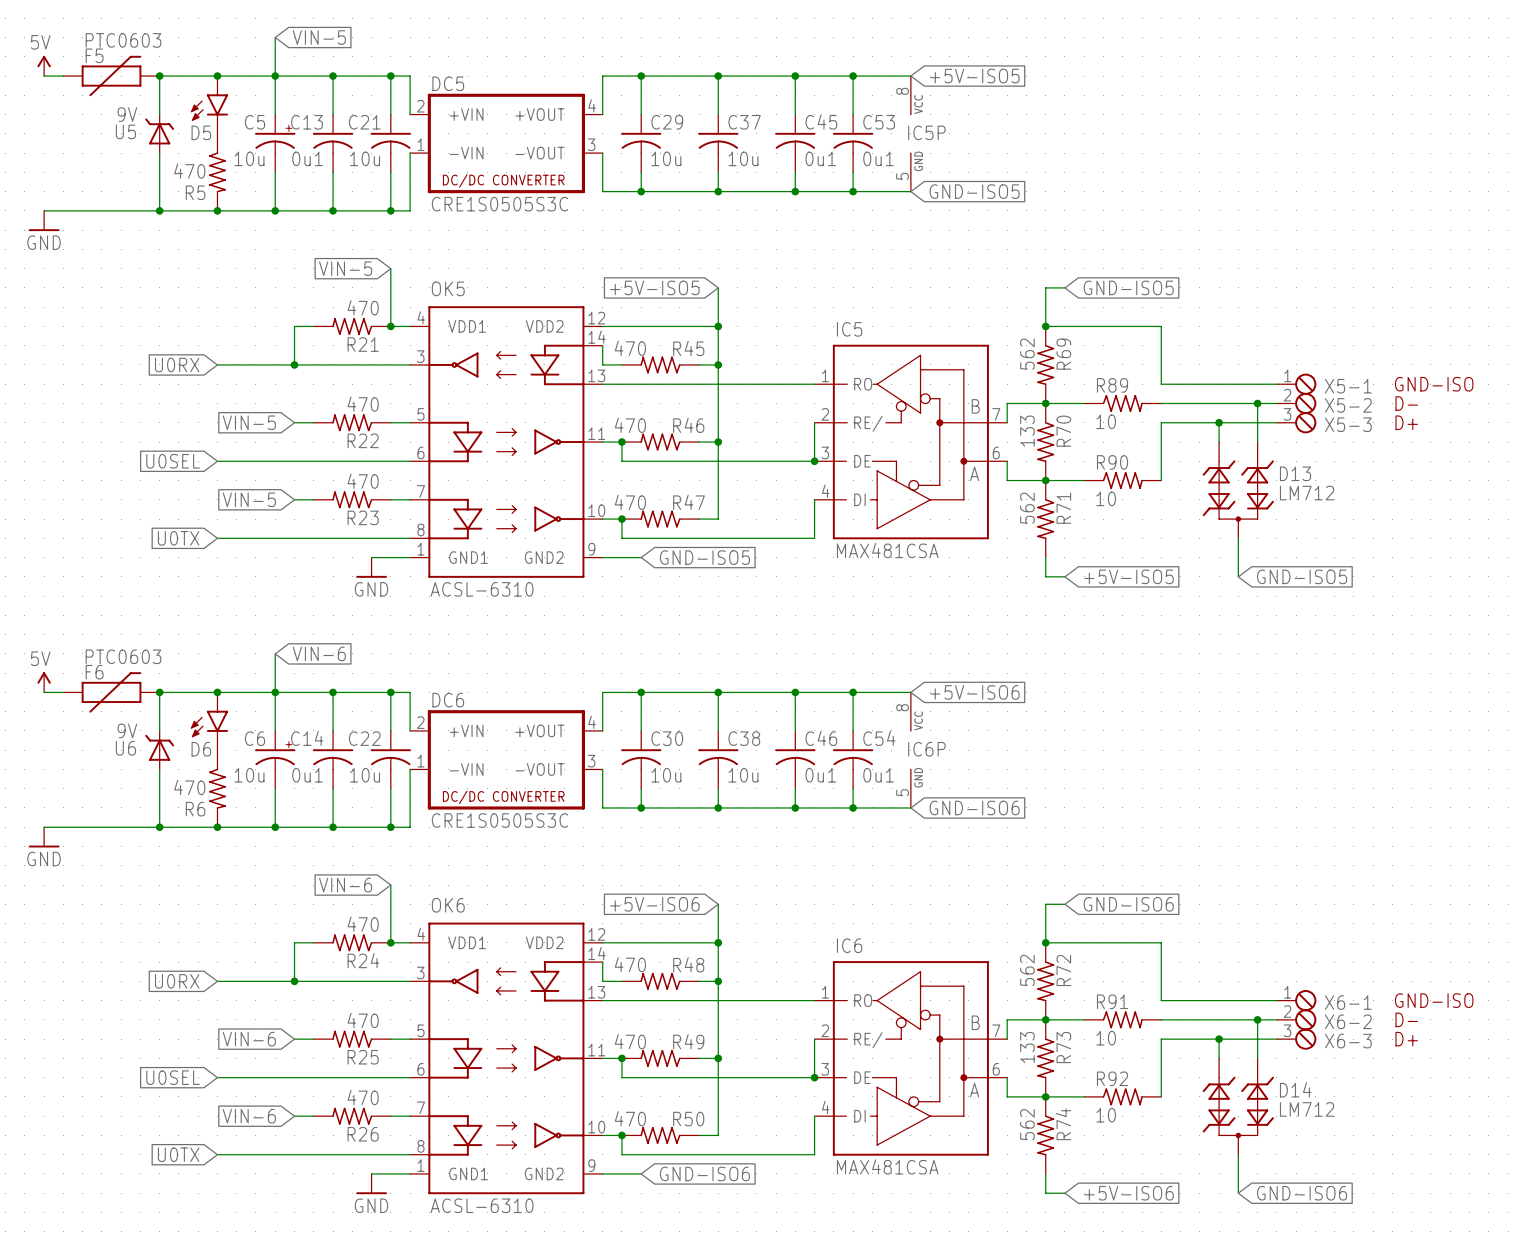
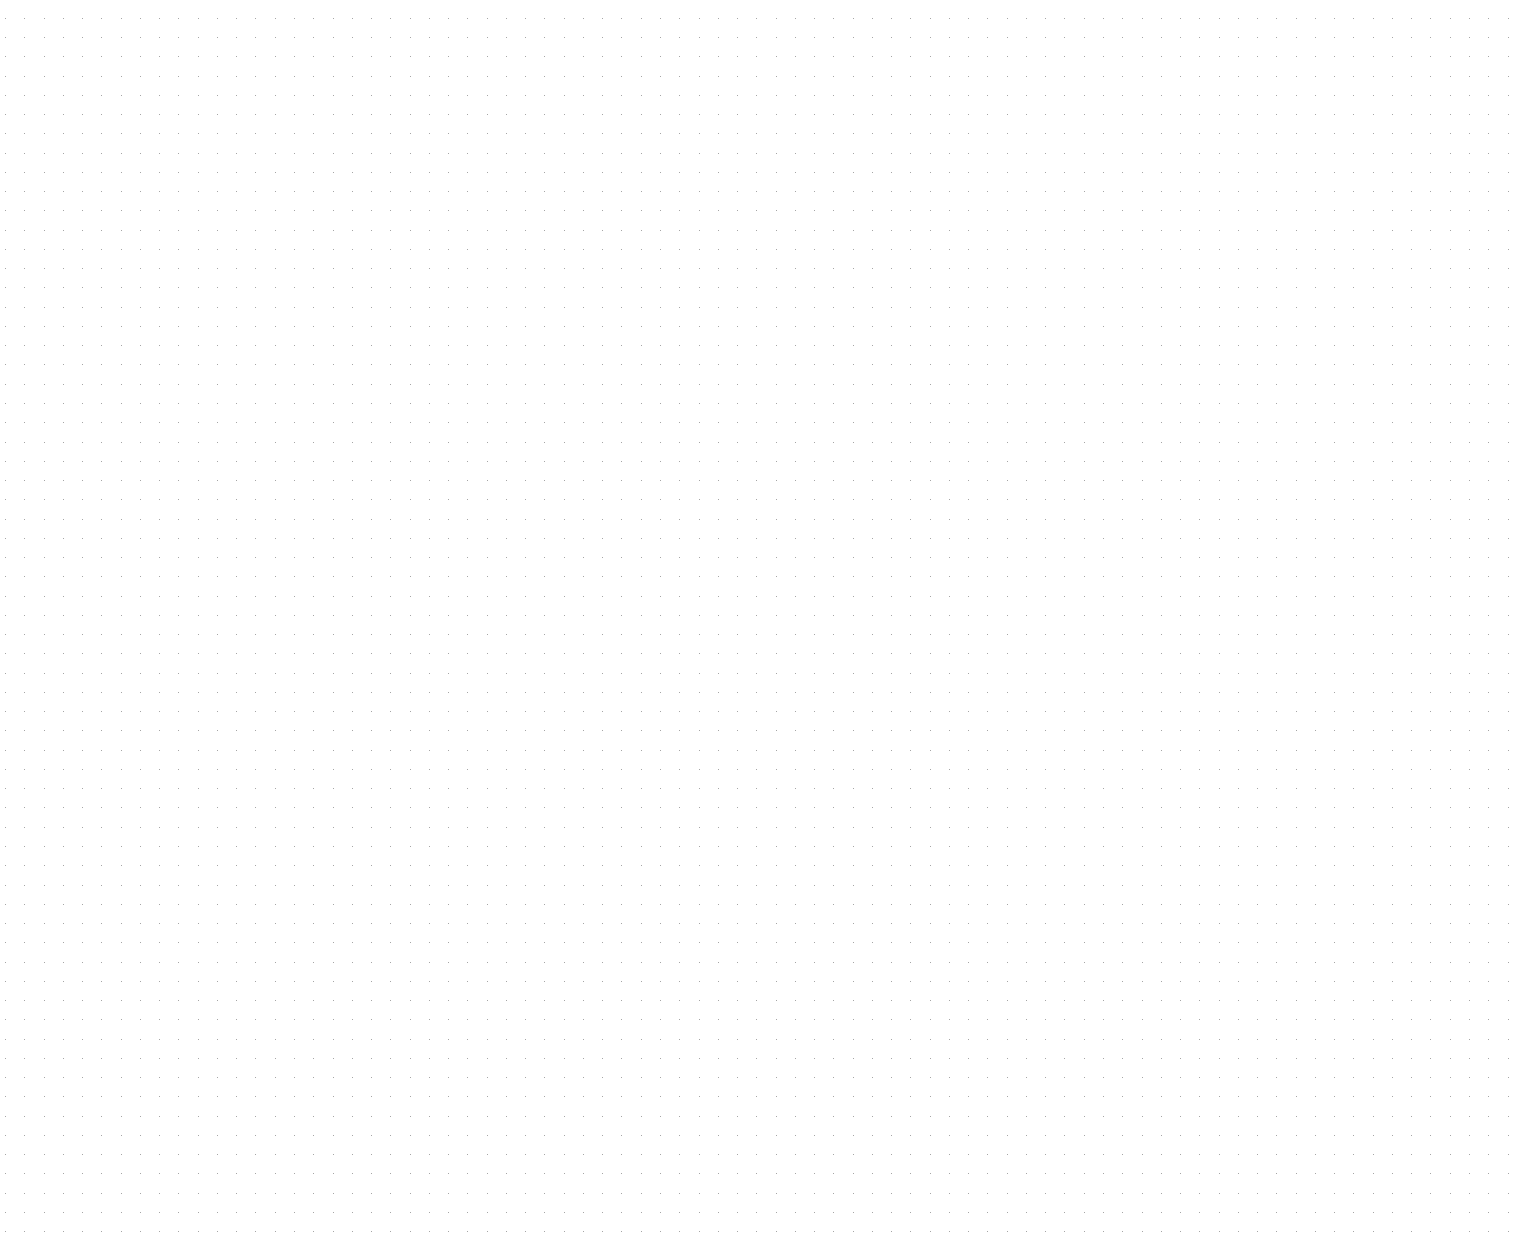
wire: (275, 37) (275, 114) -> none
global label: VIN-5 (319, 37) -> none
power symbol: 5V (44, 65) -> none
wire: (44, 76) (63, 76) -> none
F5: PTC0603 (111, 76) -> none
junction: (159, 76) -> none
junction: (217, 76) -> none
junction: (275, 76) -> none
wire: (333, 76) (333, 114) -> none
junction: (333, 76) -> none
wire: (390, 76) (390, 114) -> none
junction: (390, 76) -> none
wire: (641, 76) (641, 114) -> none
junction: (641, 76) -> none
wire: (718, 76) (718, 114) -> none
junction: (718, 76) -> none
wire: (795, 76) (795, 114) -> none
junction: (795, 76) -> none
wire: (853, 76) (853, 114) -> none
junction: (853, 76) -> none
wire: (910, 76) (602, 76) (602, 114) -> none
global label: +5V-ISO5 (974, 76) -> none
D5: (209, 104) -> none
wire: (159, 114) (159, 76) (410, 76) (410, 114) -> none
U5: 9V (159, 133) -> none
IC5P: (910, 133) -> none
C5: 10u (275, 143) -> none
C13: 0u1 (333, 143) -> none
C21: 10u (390, 143) -> none
DC5: CRE1S0505S3C (506, 143) -> none
C29: 10u (641, 143) -> none
C37: 10u (718, 143) -> none
C45: 0u1 (795, 143) -> none
C53: 0u1 (853, 143) -> none
wire: (159, 153) (159, 210) -> none
wire: (410, 153) (410, 210) (44, 210) -> none
wire: (602, 153) (602, 191) (910, 191) -> none
R5: 470 (217, 172) -> none
wire: (275, 172) (275, 210) -> none
wire: (333, 172) (333, 210) -> none
wire: (390, 172) (390, 210) -> none
wire: (641, 172) (641, 191) -> none
wire: (718, 172) (718, 191) -> none
wire: (795, 172) (795, 191) -> none
wire: (853, 172) (853, 191) -> none
junction: (641, 191) -> none
junction: (718, 191) -> none
junction: (795, 191) -> none
junction: (853, 191) -> none
global label: GND-ISO5 (974, 191) -> none
junction: (159, 210) -> none
junction: (217, 210) -> none
junction: (275, 210) -> none
junction: (333, 210) -> none
junction: (390, 210) -> none
power symbol: GND (44, 220) -> none
global label: VIN-5 (345, 268) -> none
wire: (390, 268) (390, 326) (410, 326) -> none
global label: +5V-ISO5 (654, 287) -> none
wire: (718, 287) (718, 519) (699, 519) -> none
wire: (1064, 287) (1045, 287) (1045, 326) (1161, 326) (1161, 384) (1276, 384) -> none
global label: GND-ISO5 (1128, 287) -> none
wire: (313, 326) (294, 326) (294, 364) -> none
R21: 470 (352, 326) -> none
junction: (390, 326) -> none
wire: (602, 326) (718, 326) -> none
junction: (718, 326) -> none
junction: (1045, 326) -> none
wire: (602, 345) (602, 364) (621, 364) -> none
global label: U0RX (177, 364) -> none
wire: (217, 364) (410, 364) -> none
junction: (294, 364) -> none
R45: 470 (660, 364) -> none
wire: (699, 364) (718, 364) -> none
junction: (718, 364) -> none
R69: 562 (1045, 364) -> none
wire: (602, 384) (814, 384) -> none
X5-1: (1296, 384) -> none
text: GND-ISO (1434, 384) -> none
junction: (1045, 403) -> none
wire: (1084, 403) (1007, 403) (1007, 422) -> none
R89: 10 (1122, 403) -> none
wire: (1161, 403) (1276, 403) -> none
wire: (1257, 403) (1257, 442) -> none
junction: (1257, 403) -> none
X5-2: (1296, 403) -> none
text: D- (1406, 403) -> none
global label: VIN-5 (249, 422) -> none
wire: (294, 422) (313, 422) -> none
R22: 470 (352, 422) -> none
wire: (390, 422) (410, 422) -> none
wire: (814, 422) (814, 461) (621, 461) (621, 442) (602, 442) -> none
wire: (1219, 422) (1219, 442) -> none
junction: (1219, 422) -> none
wire: (1276, 422) (1161, 422) (1161, 480) -> none
X5-3: (1296, 422) -> none
text: D+ (1406, 422) -> none
OK5: ACSL-6310 (506, 442) -> none
junction: (621, 442) -> none
R46: 470 (660, 442) -> none
wire: (699, 442) (718, 442) -> none
junction: (718, 442) -> none
IC5: MAX481CSA (910, 442) -> none
R70: 133 (1045, 442) -> none
global label: U0SEL (173, 461) -> none
wire: (217, 461) (410, 461) -> none
junction: (814, 461) -> none
wire: (1007, 461) (1007, 480) (1084, 480) -> none
junction: (1045, 480) -> none
R90: 10 (1122, 480) -> none
D13: LM712 (1238, 490) -> none
global label: VIN-5 (249, 499) -> none
wire: (294, 499) (313, 499) -> none
R23: 470 (352, 499) -> none
wire: (390, 499) (410, 499) -> none
wire: (814, 499) (814, 538) (621, 538) (621, 519) (602, 519) -> none
junction: (621, 519) -> none
R47: 470 (660, 519) -> none
R71: 562 (1045, 519) -> none
global label: U0TX (178, 538) -> none
wire: (217, 538) (410, 538) -> none
wire: (1238, 538) (1238, 576) -> none
wire: (371, 557) (410, 557) -> none
wire: (602, 557) (641, 557) -> none
global label: GND-ISO5 (704, 557) -> none
wire: (1045, 557) (1045, 576) (1064, 576) -> none
power symbol: GND (371, 567) -> none
global label: +5V-ISO5 (1128, 576) -> none
global label: GND-ISO5 (1302, 576) -> none
wire: (275, 653) (275, 730) -> none
global label: VIN-6 (319, 653) -> none
power symbol: 5V (44, 682) -> none
wire: (44, 692) (63, 692) -> none
F6: PTC0603 (111, 692) -> none
junction: (159, 692) -> none
junction: (217, 692) -> none
junction: (275, 692) -> none
wire: (333, 692) (333, 730) -> none
junction: (333, 692) -> none
wire: (390, 692) (390, 730) -> none
junction: (390, 692) -> none
wire: (641, 692) (641, 730) -> none
junction: (641, 692) -> none
wire: (718, 692) (718, 730) -> none
junction: (718, 692) -> none
wire: (795, 692) (795, 730) -> none
junction: (795, 692) -> none
wire: (853, 692) (853, 730) -> none
junction: (853, 692) -> none
wire: (910, 692) (602, 692) (602, 730) -> none
global label: +5V-ISO6 (974, 692) -> none
D6: (209, 721) -> none
wire: (159, 730) (159, 692) (410, 692) (410, 730) -> none
U6: 9V (159, 750) -> none
IC6P: (910, 750) -> none
C6: 10u (275, 759) -> none
C14: 0u1 (333, 759) -> none
C22: 10u (390, 759) -> none
DC6: CRE1S0505S3C (506, 759) -> none
C30: 10u (641, 759) -> none
C38: 10u (718, 759) -> none
C46: 0u1 (795, 759) -> none
C54: 0u1 (853, 759) -> none
wire: (159, 769) (159, 827) -> none
wire: (410, 769) (410, 827) (44, 827) -> none
wire: (602, 769) (602, 807) (910, 807) -> none
R6: 470 (217, 788) -> none
wire: (275, 788) (275, 827) -> none
wire: (333, 788) (333, 827) -> none
wire: (390, 788) (390, 827) -> none
wire: (641, 788) (641, 807) -> none
wire: (718, 788) (718, 807) -> none
wire: (795, 788) (795, 807) -> none
wire: (853, 788) (853, 807) -> none
junction: (641, 807) -> none
junction: (718, 807) -> none
junction: (795, 807) -> none
junction: (853, 807) -> none
global label: GND-ISO6 (974, 807) -> none
junction: (159, 827) -> none
junction: (217, 827) -> none
junction: (275, 827) -> none
junction: (333, 827) -> none
junction: (390, 827) -> none
power symbol: GND (44, 837) -> none
global label: VIN-6 (345, 885) -> none
wire: (390, 885) (390, 942) (410, 942) -> none
global label: +5V-ISO6 (654, 904) -> none
wire: (718, 904) (718, 1135) (699, 1135) -> none
wire: (1064, 904) (1045, 904) (1045, 942) (1161, 942) (1161, 1000) (1276, 1000) -> none
global label: GND-ISO6 (1128, 904) -> none
wire: (313, 942) (294, 942) (294, 981) -> none
R24: 470 (352, 942) -> none
junction: (390, 942) -> none
wire: (602, 942) (718, 942) -> none
junction: (718, 942) -> none
junction: (1045, 942) -> none
wire: (602, 962) (602, 981) (621, 981) -> none
global label: U0RX (177, 981) -> none
wire: (217, 981) (410, 981) -> none
junction: (294, 981) -> none
R48: 470 (660, 981) -> none
wire: (699, 981) (718, 981) -> none
junction: (718, 981) -> none
R72: 562 (1045, 981) -> none
wire: (602, 1000) (814, 1000) -> none
X6-1: (1296, 1000) -> none
text: GND-ISO (1434, 1000) -> none
junction: (1045, 1019) -> none
wire: (1084, 1019) (1007, 1019) (1007, 1039) -> none
R91: 10 (1122, 1019) -> none
wire: (1161, 1019) (1276, 1019) -> none
wire: (1257, 1019) (1257, 1058) -> none
junction: (1257, 1019) -> none
X6-2: (1296, 1019) -> none
text: D- (1406, 1019) -> none
global label: VIN-6 (249, 1039) -> none
wire: (294, 1039) (313, 1039) -> none
R25: 470 (352, 1039) -> none
wire: (390, 1039) (410, 1039) -> none
wire: (814, 1039) (814, 1077) (621, 1077) (621, 1058) (602, 1058) -> none
wire: (1219, 1039) (1219, 1058) -> none
junction: (1219, 1039) -> none
wire: (1276, 1039) (1161, 1039) (1161, 1096) -> none
X6-3: (1296, 1039) -> none
text: D+ (1406, 1039) -> none
OK6: ACSL-6310 (506, 1058) -> none
junction: (621, 1058) -> none
R49: 470 (660, 1058) -> none
wire: (699, 1058) (718, 1058) -> none
junction: (718, 1058) -> none
IC6: MAX481CSA (910, 1058) -> none
R73: 133 (1045, 1058) -> none
global label: U0SEL (173, 1077) -> none
wire: (217, 1077) (410, 1077) -> none
junction: (814, 1077) -> none
wire: (1007, 1077) (1007, 1096) (1084, 1096) -> none
junction: (1045, 1096) -> none
R92: 10 (1122, 1096) -> none
D14: LM712 (1238, 1106) -> none
global label: VIN-6 (249, 1116) -> none
wire: (294, 1116) (313, 1116) -> none
R26: 470 (352, 1116) -> none
wire: (390, 1116) (410, 1116) -> none
wire: (814, 1116) (814, 1154) (621, 1154) (621, 1135) (602, 1135) -> none
junction: (621, 1135) -> none
R50: 470 (660, 1135) -> none
R74: 562 (1045, 1135) -> none
global label: U0TX (178, 1154) -> none
wire: (217, 1154) (410, 1154) -> none
wire: (1238, 1154) (1238, 1193) -> none
wire: (371, 1173) (410, 1173) -> none
wire: (602, 1173) (641, 1173) -> none
global label: GND-ISO6 (704, 1173) -> none
wire: (1045, 1173) (1045, 1193) (1064, 1193) -> none
power symbol: GND (371, 1184) -> none
global label: +5V-ISO6 (1128, 1193) -> none
global label: GND-ISO6 (1302, 1193) -> none

